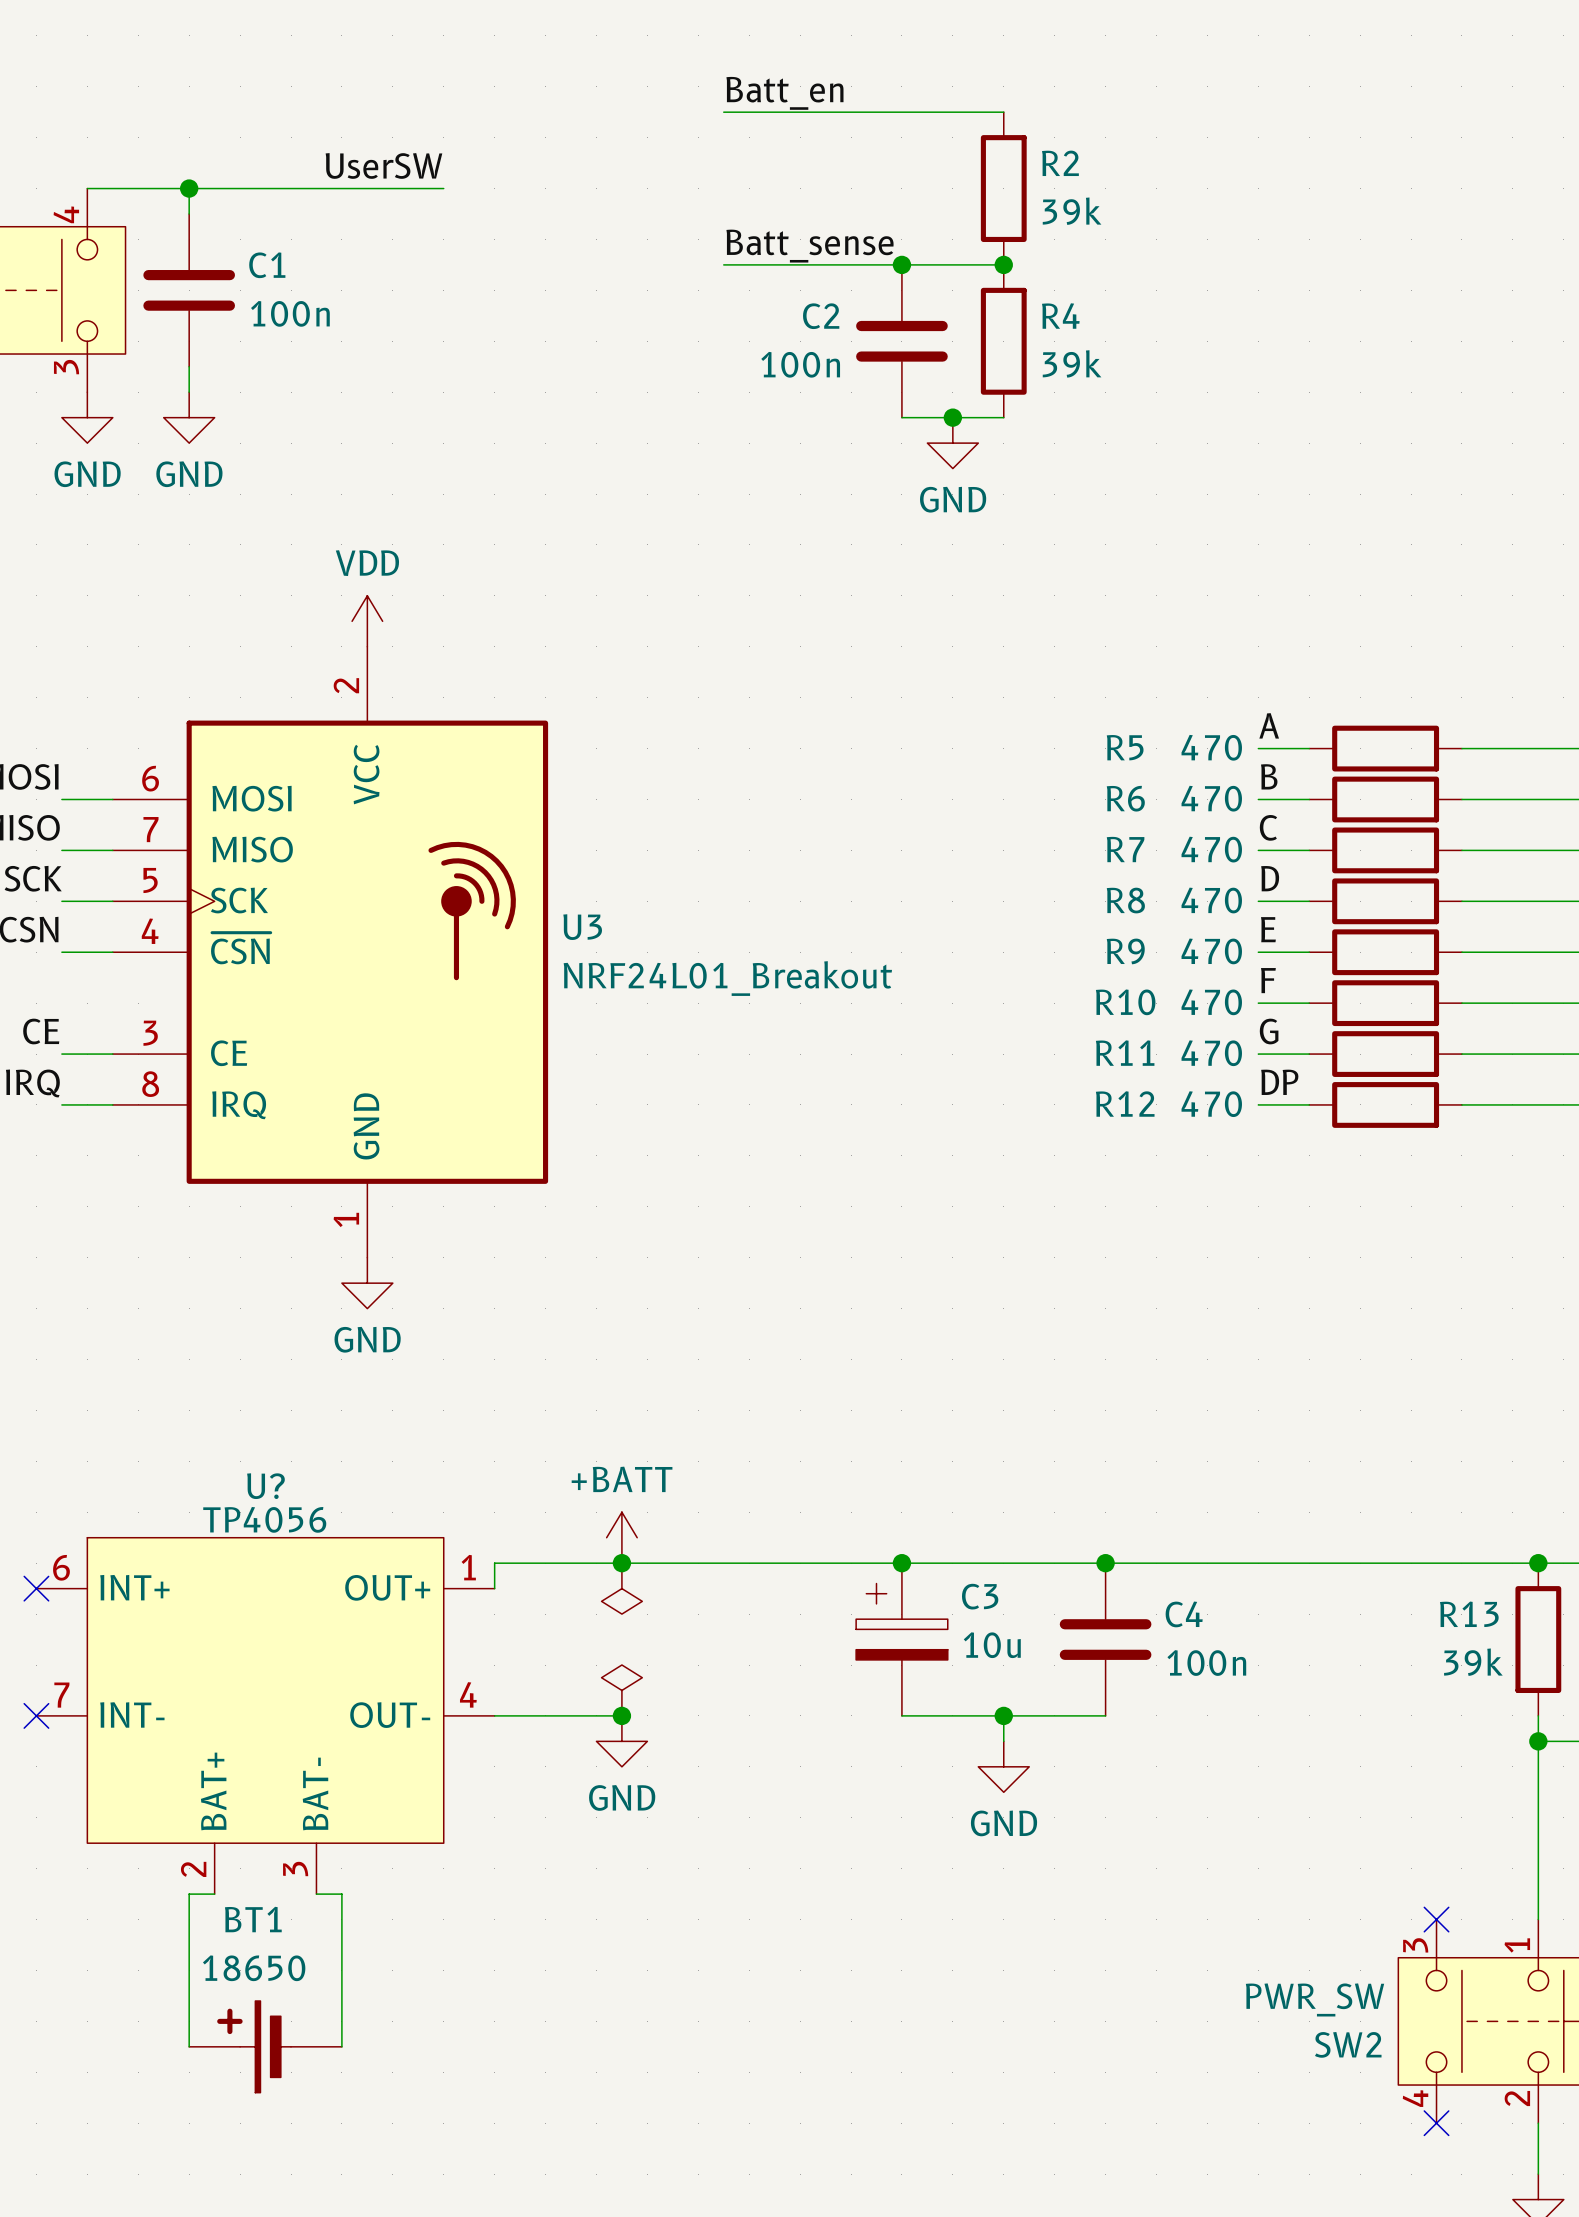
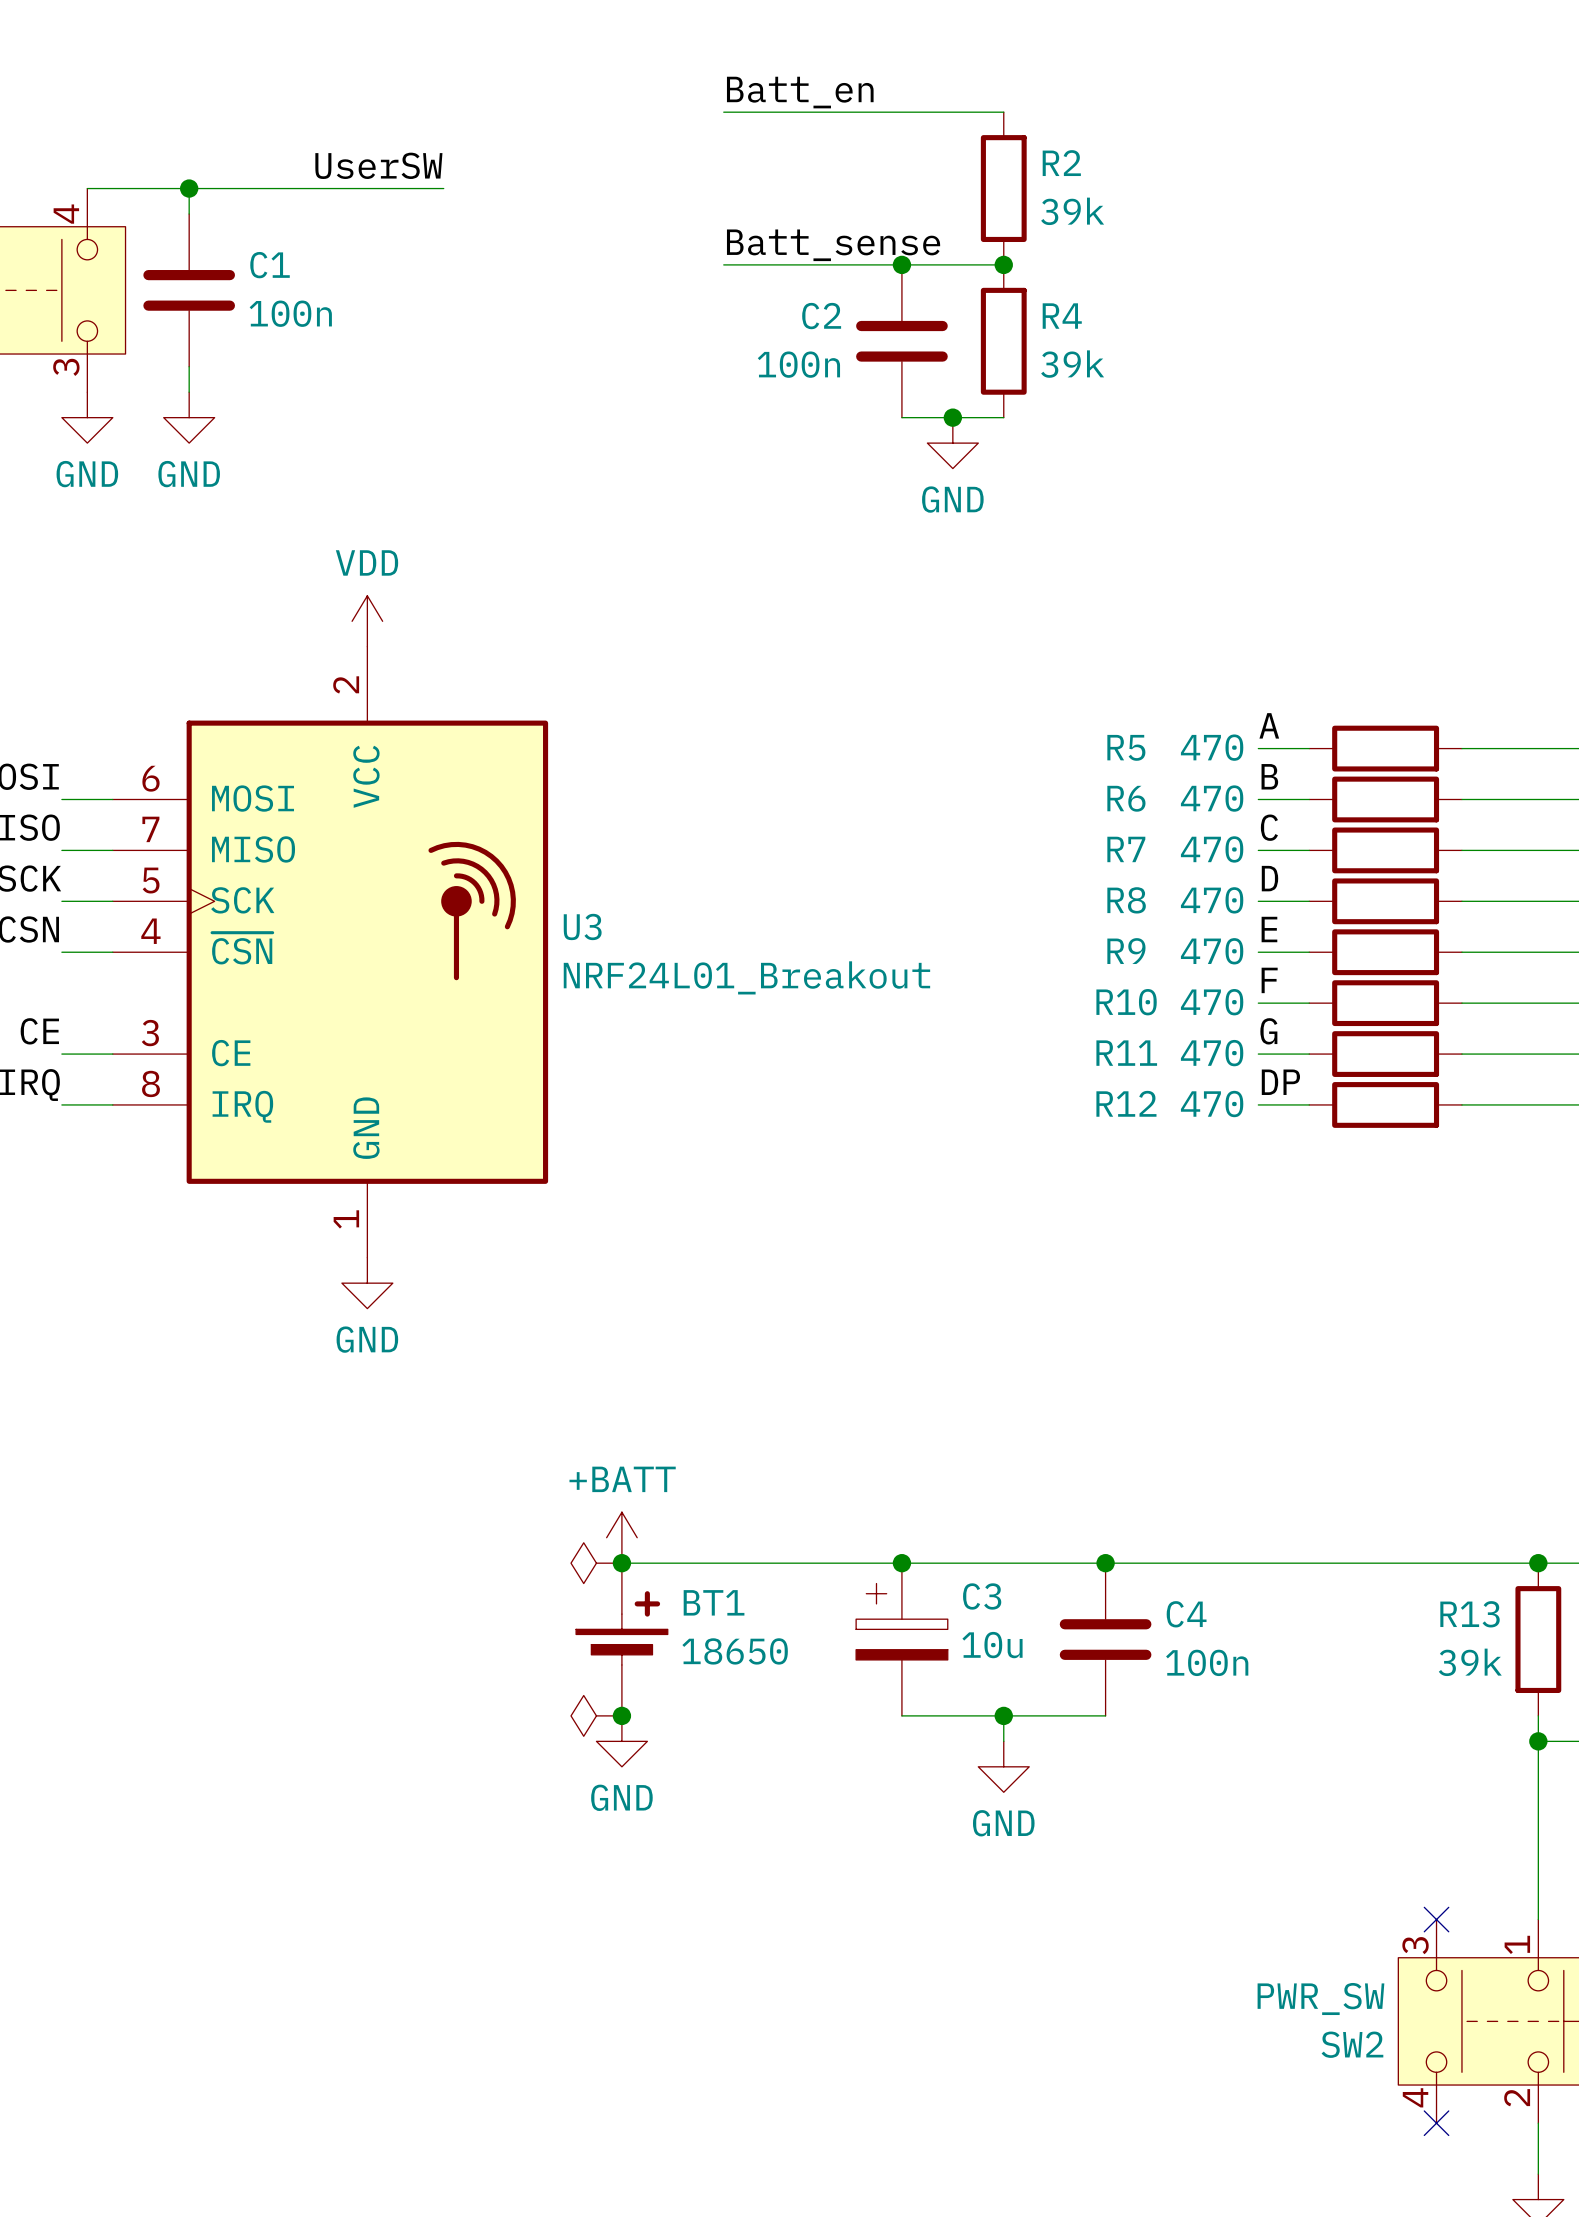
wire: (621, 1563) (494, 1563) (494, 1588) -> none
no-connect mark: (36, 1588) -> none
power symbol rotation: 0° (621, 1588) -> 90° clockwise (596, 1563)
power symbol position: (621, 1588) -> (596, 1563)
power symbol rotation: 0° (621, 1690) -> 90° counterclockwise (596, 1715)
power symbol position: (621, 1690) -> (596, 1715)
no-connect mark: (36, 1715) -> none
U?: TP4056 (265, 1715) -> none
wire: (494, 1715) (621, 1715) -> none
wire: (214, 1894) (189, 1894) (189, 2046) -> none
wire: (316, 1894) (341, 1894) (341, 2046) -> none
BT1 value position: 18650 (254, 1968) -> 18650 (735, 1651)
BT1 rotation: 0° (254, 2046) -> 90° clockwise (621, 1628)
BT1 position: (265, 2046) -> (621, 1639)

